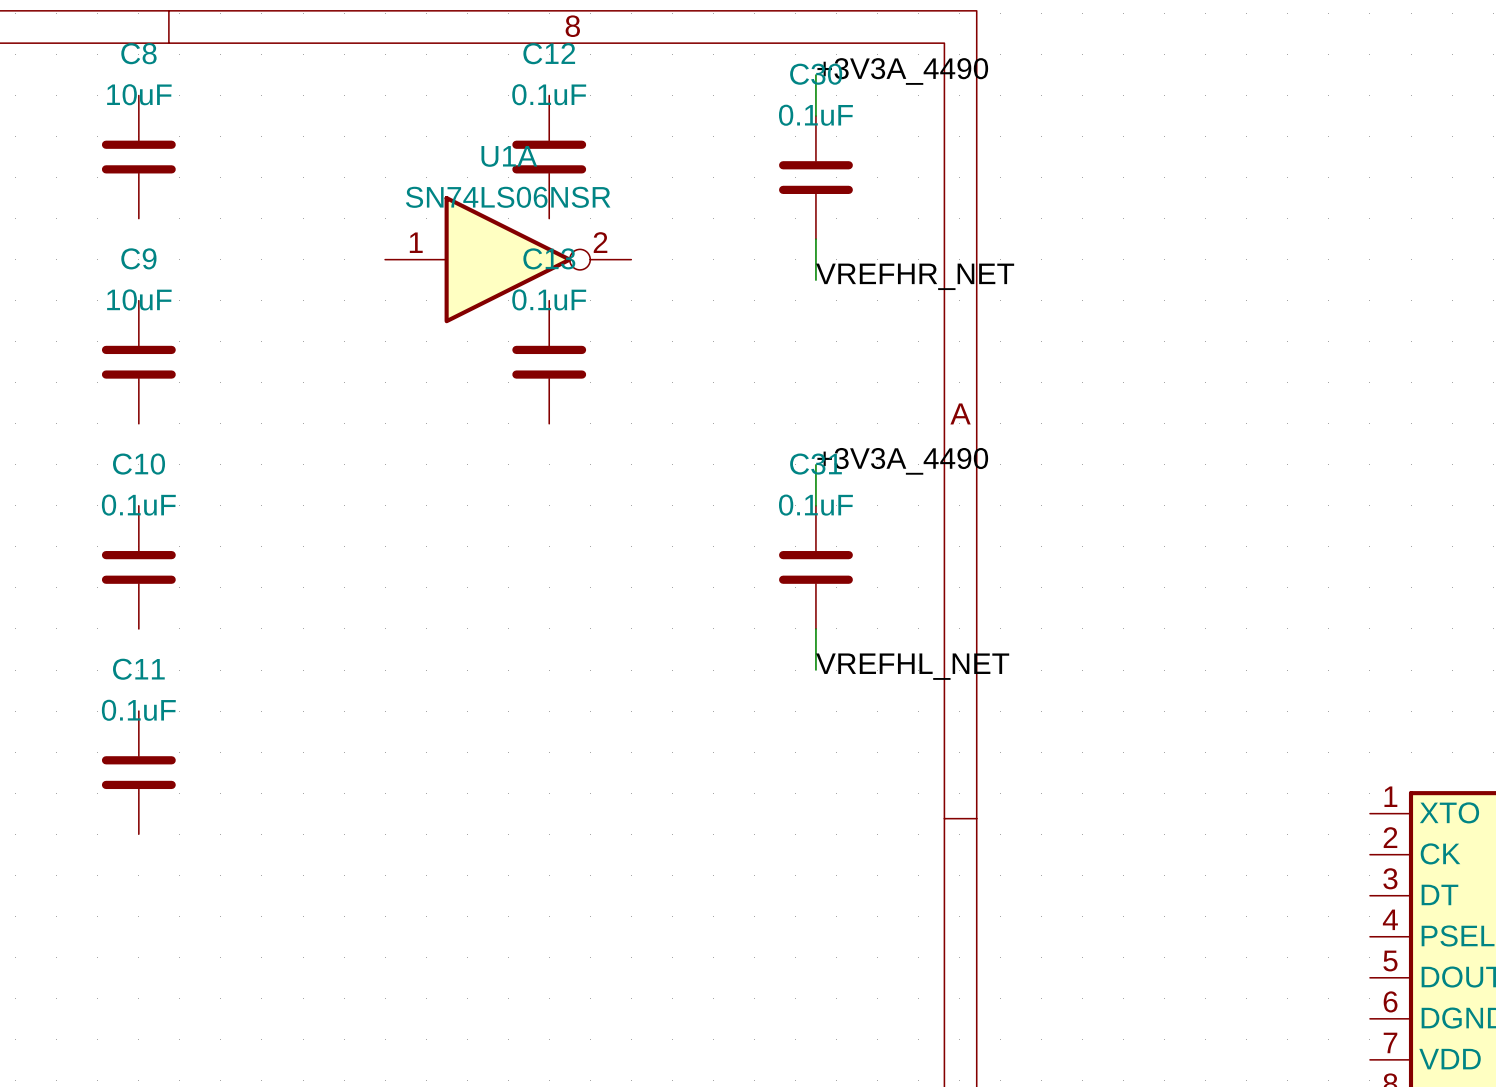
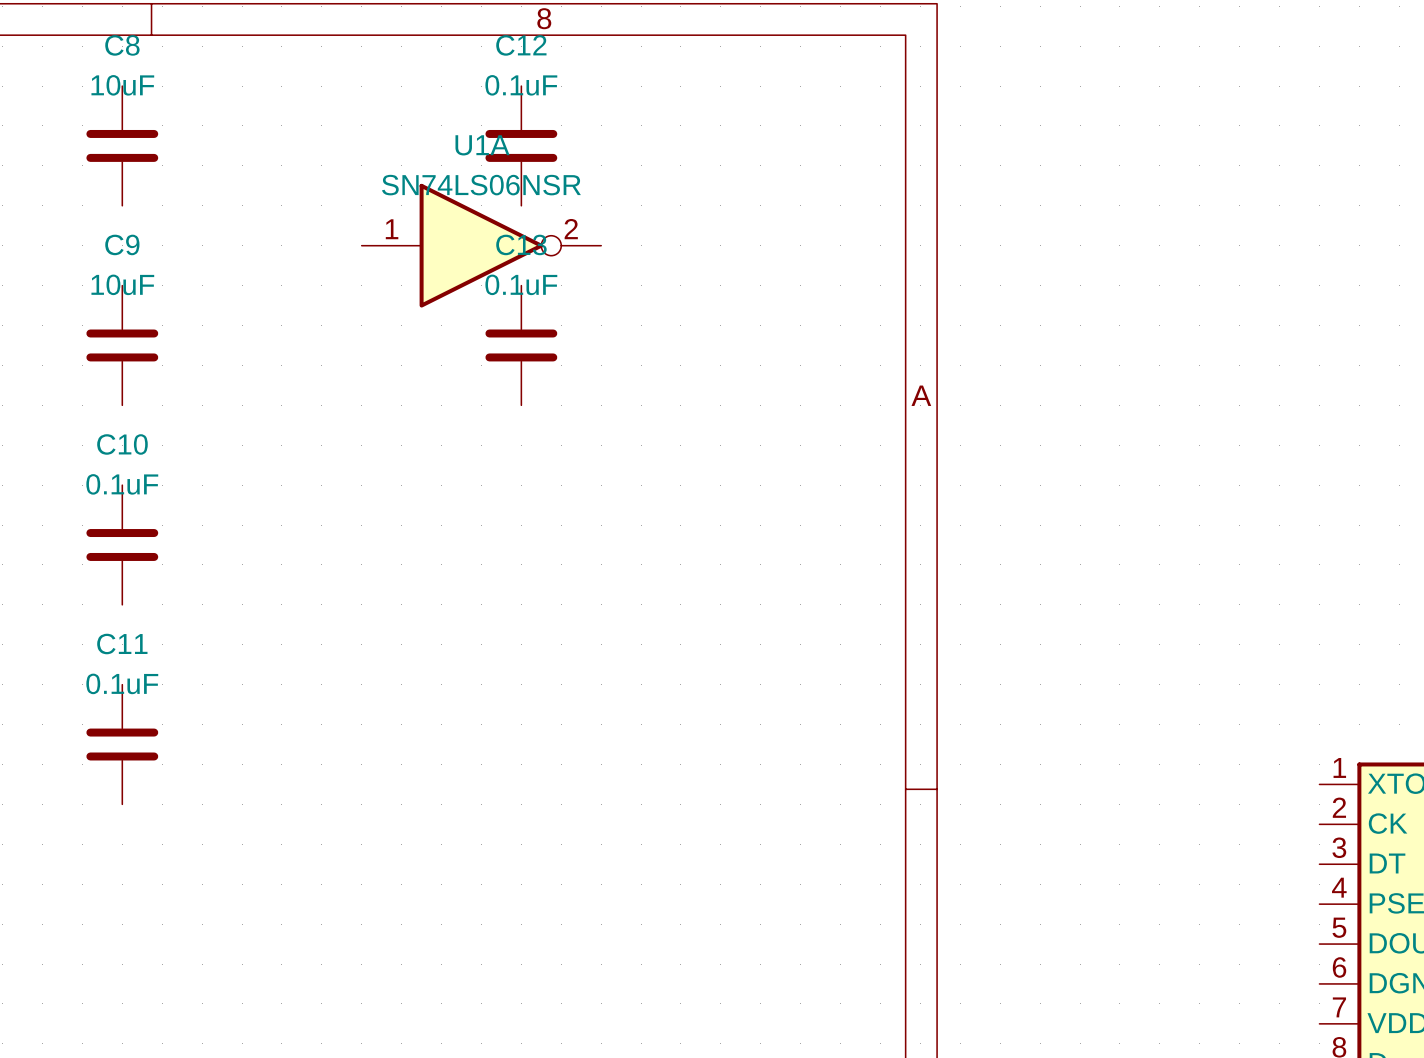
label: +3V3A_4490 (902, 71) -> none
wire: (815, 74) (815, 116) -> none
C30: 0.1uF (815, 177) -> none
wire: (815, 239) (815, 280) -> none
label: VREFHR_NET (915, 276) -> none
label: +3V3A_4490 (902, 461) -> none
wire: (815, 464) (815, 505) -> none
C31: 0.1uF (815, 567) -> none
wire: (815, 628) (815, 670) -> none
label: VREFHL_NET (912, 666) -> none

